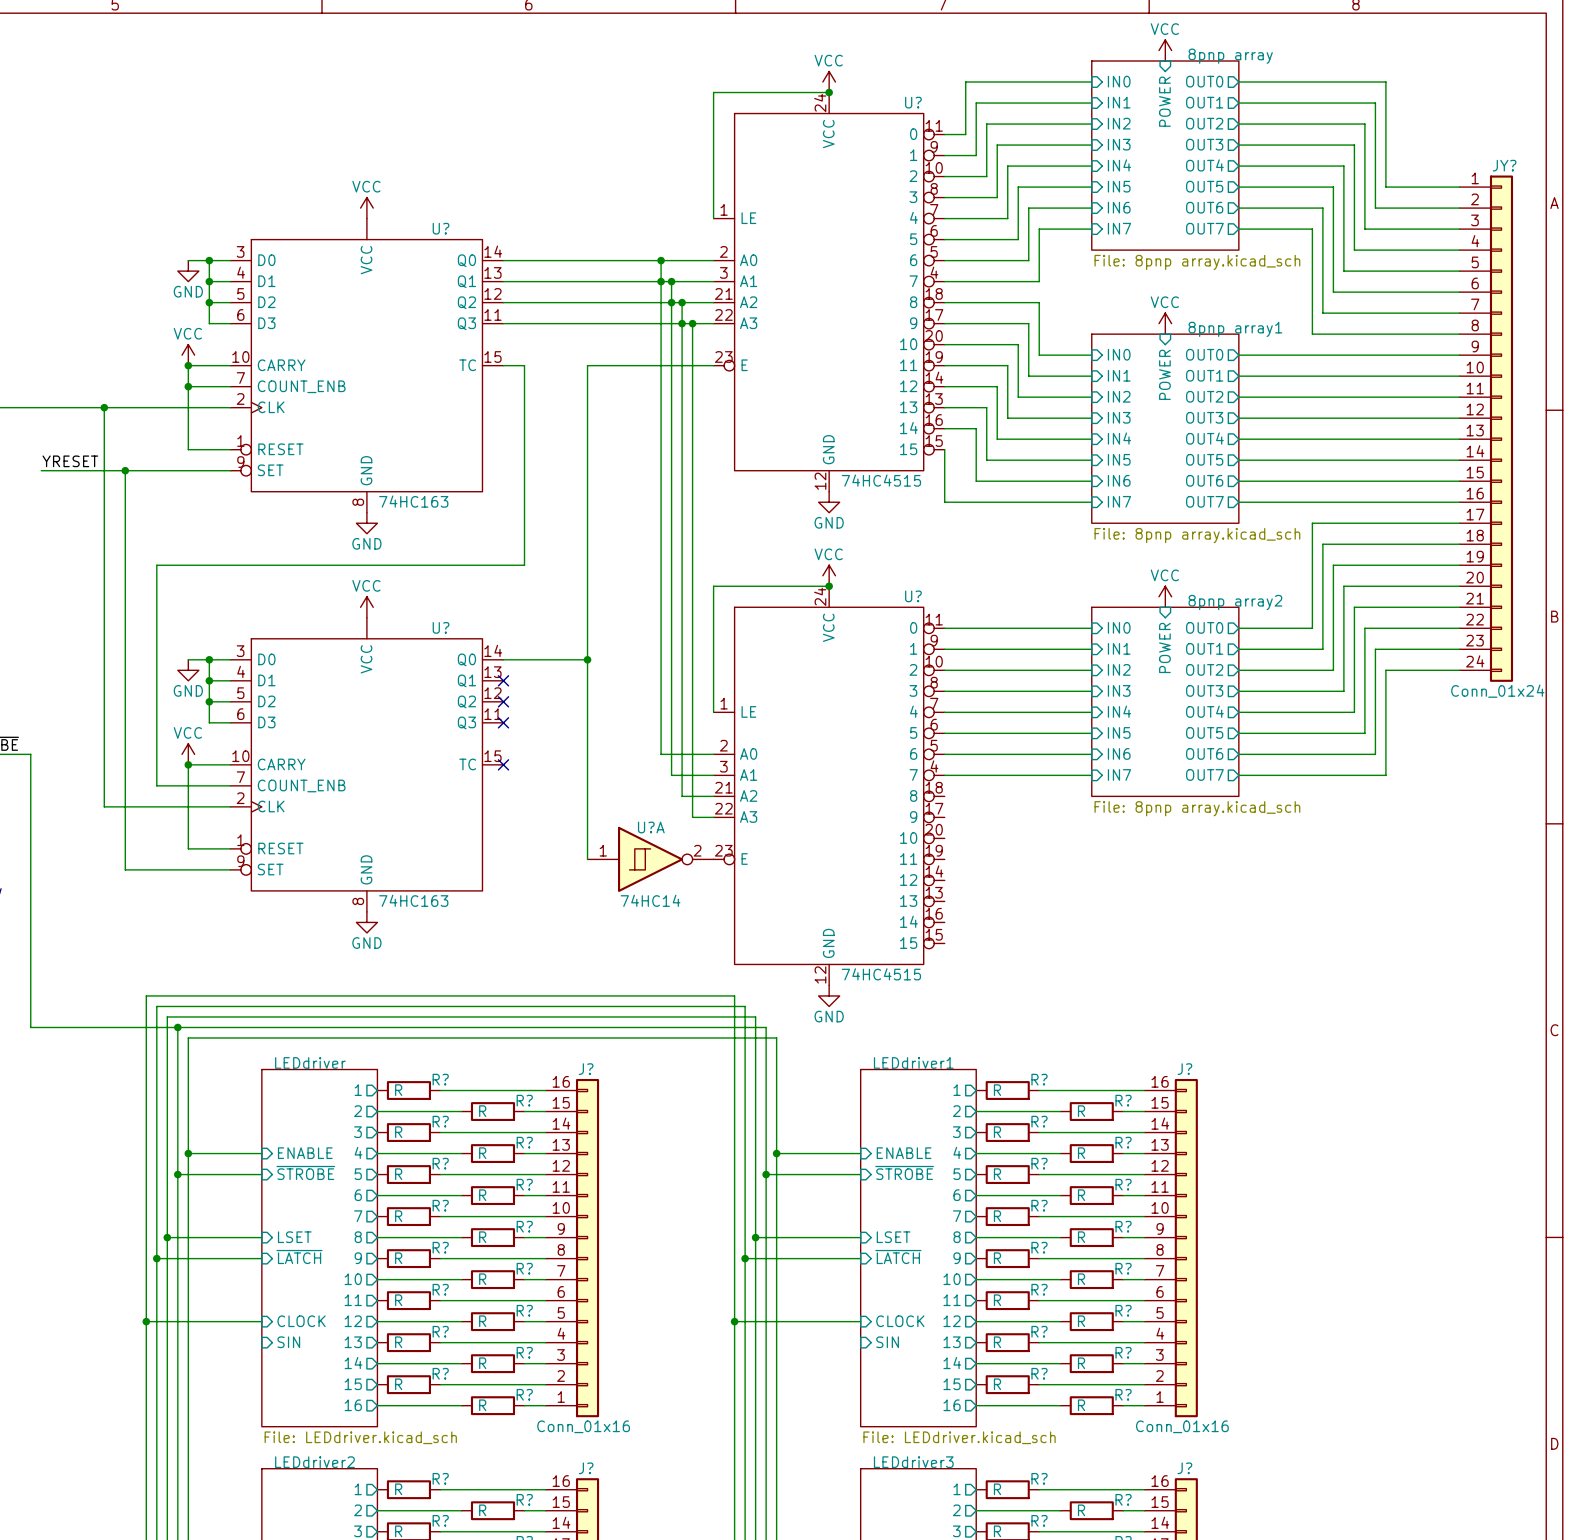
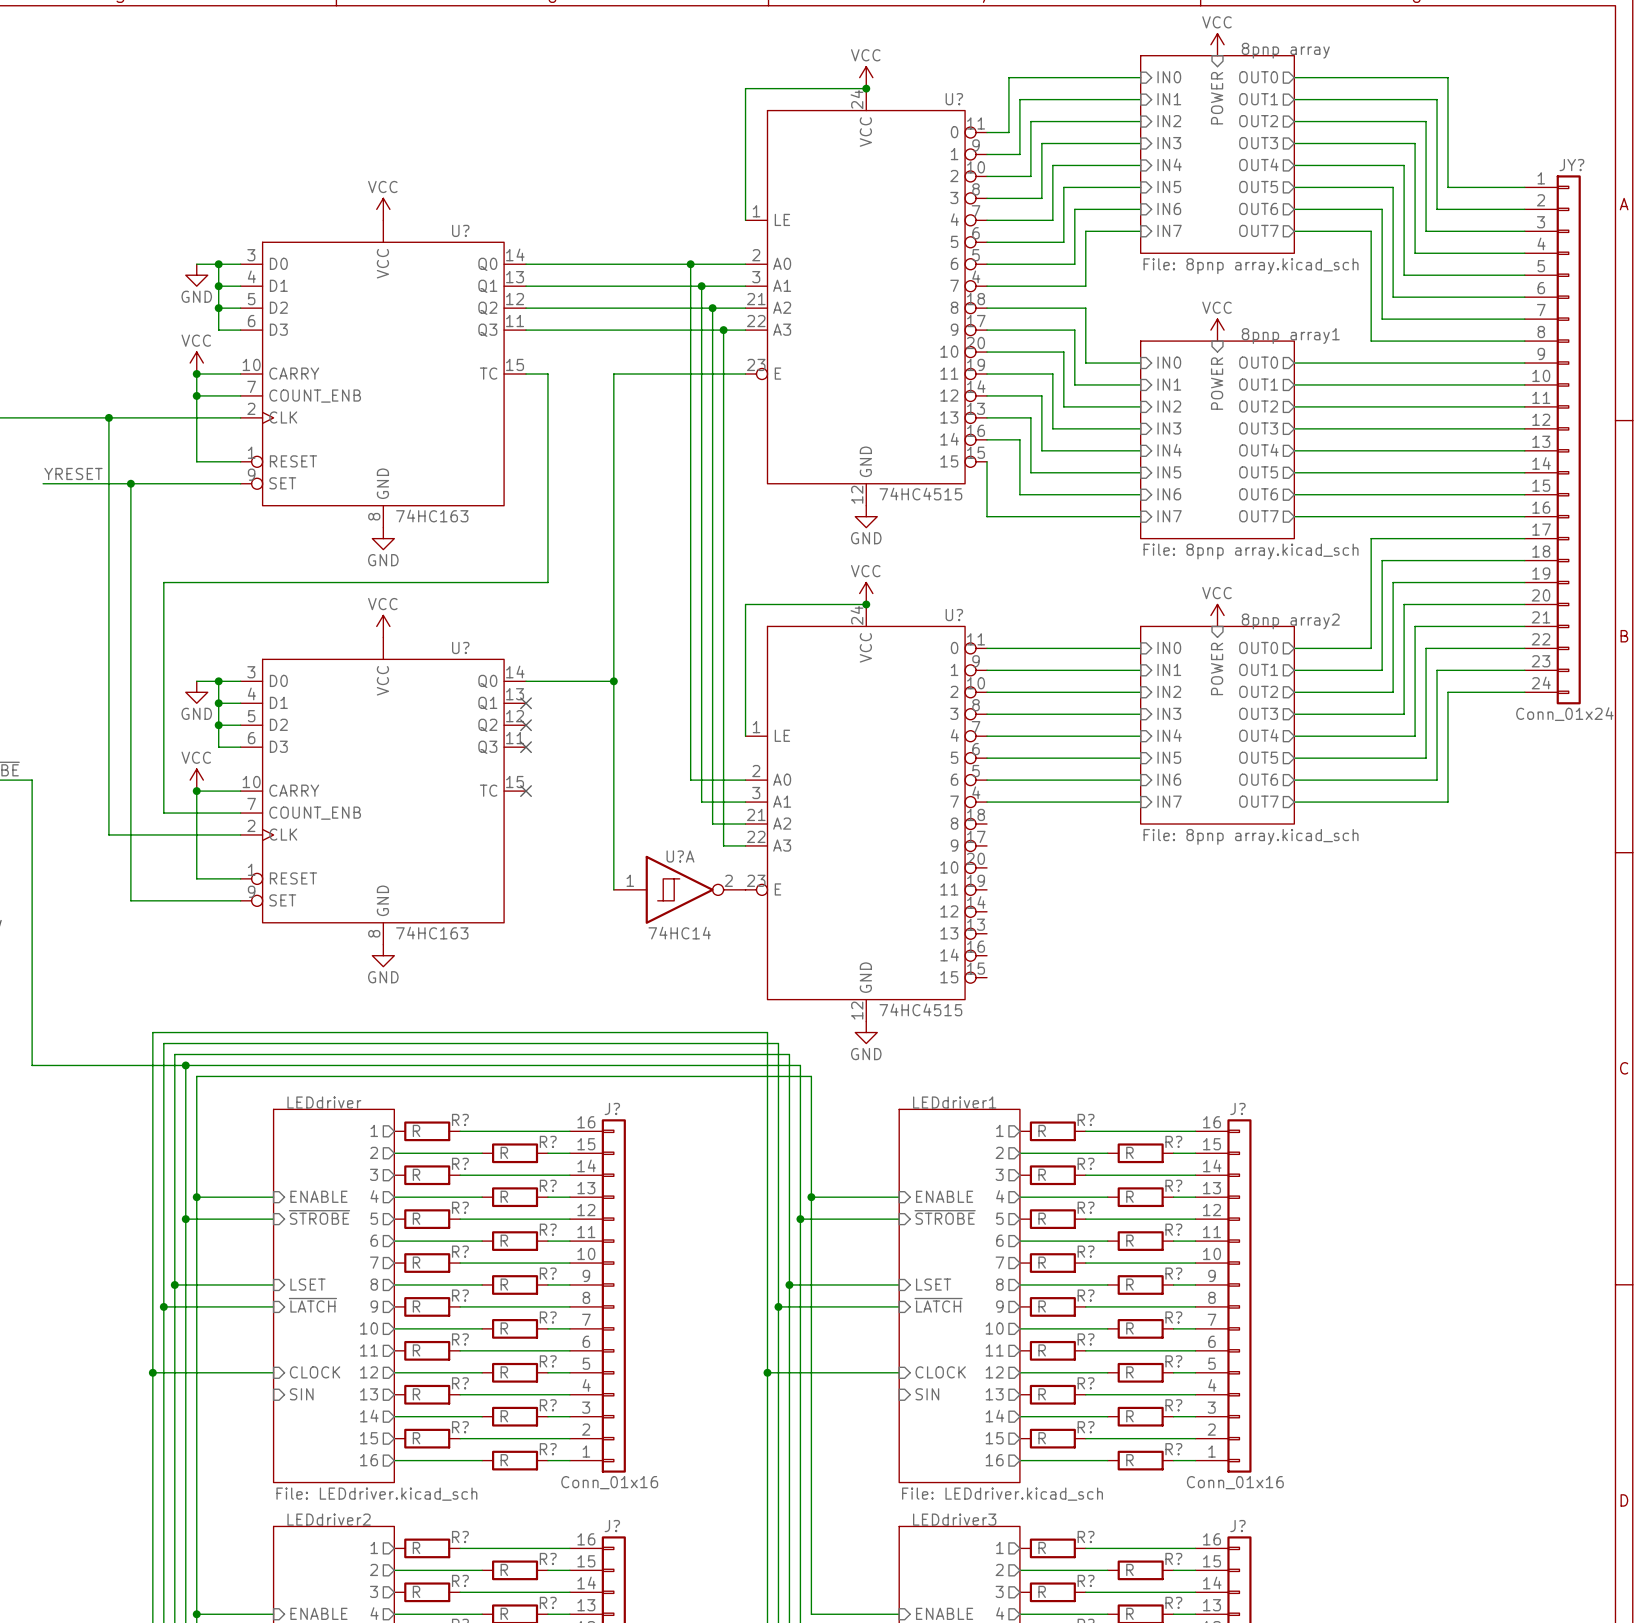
junction: (661, 281) -> none
junction: (671, 302) -> none
junction: (682, 323) -> none

